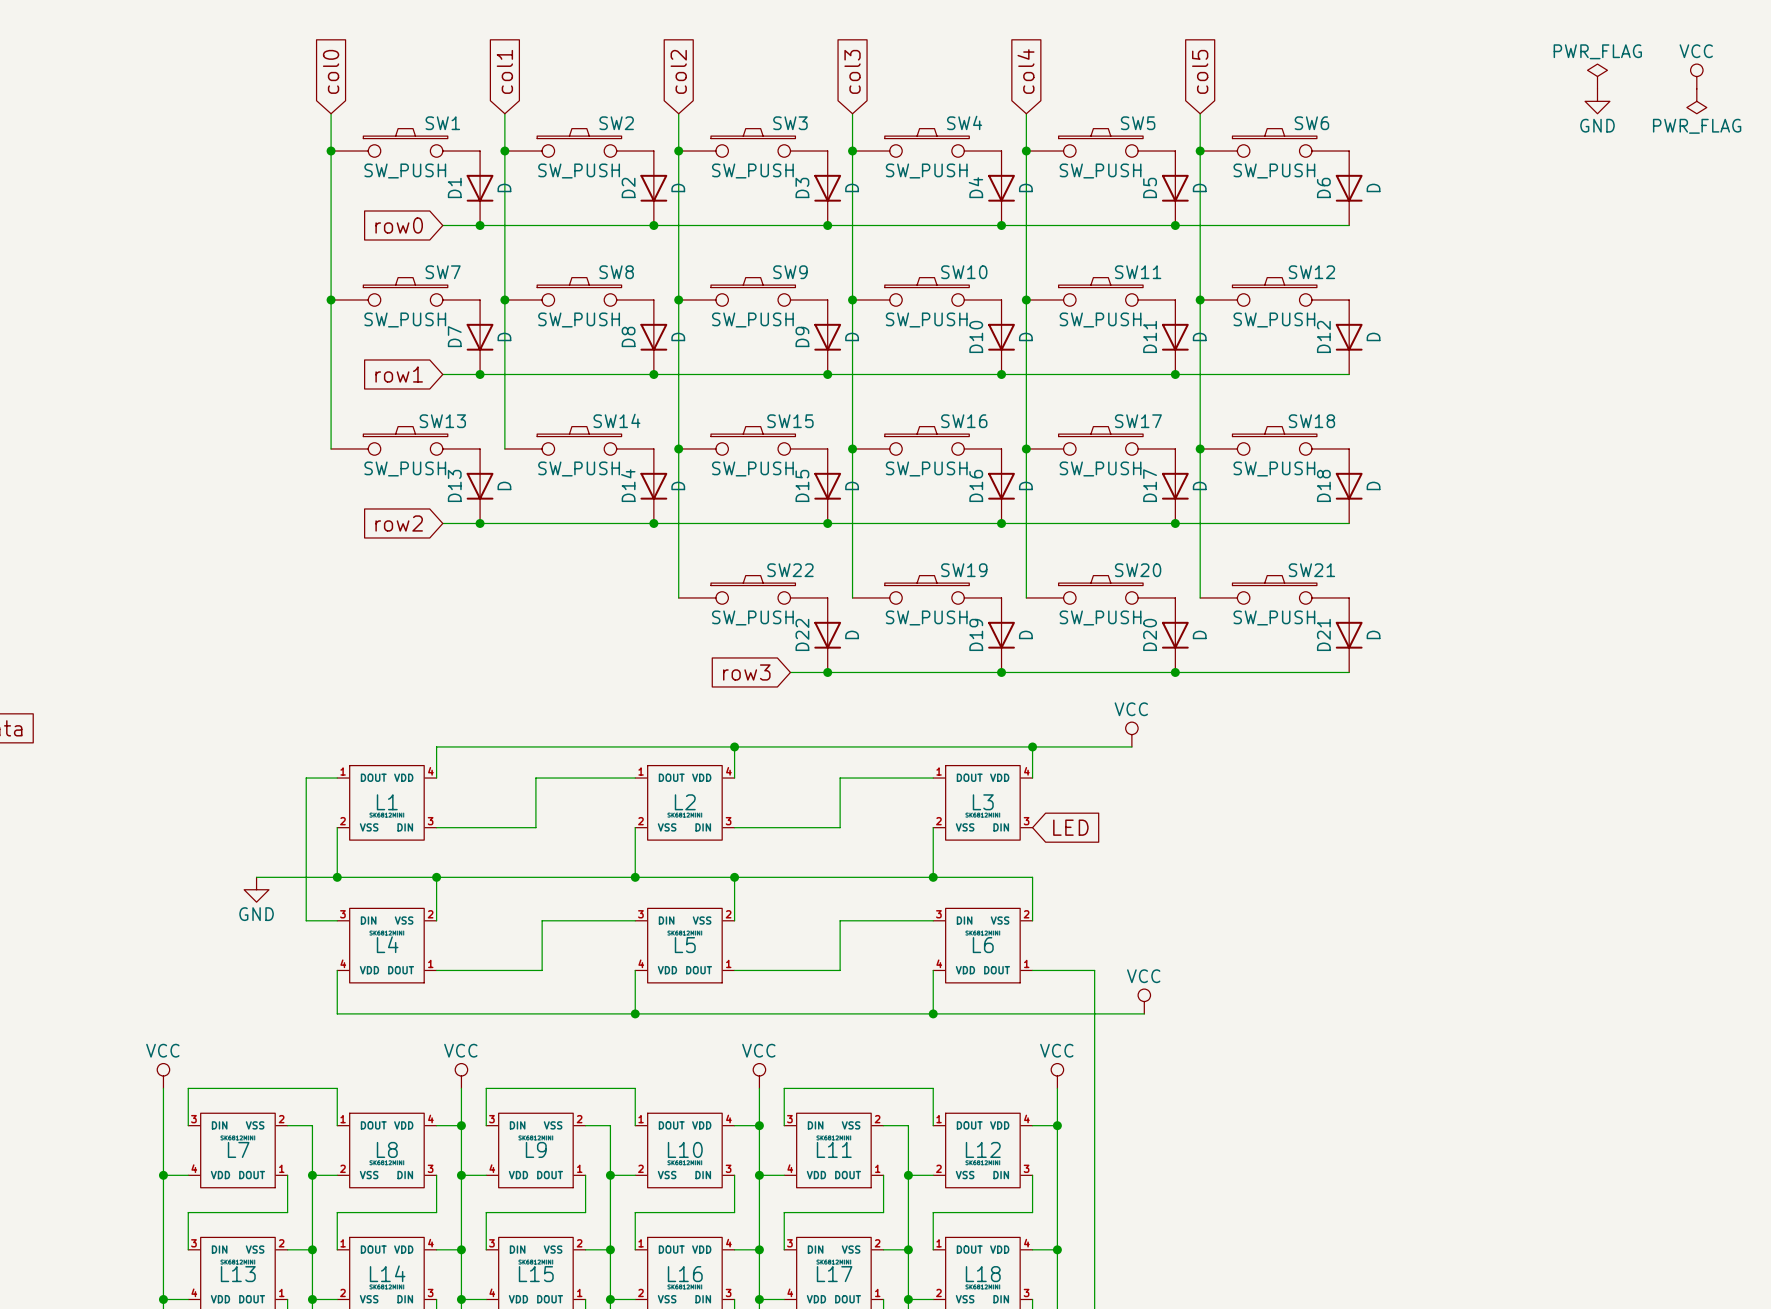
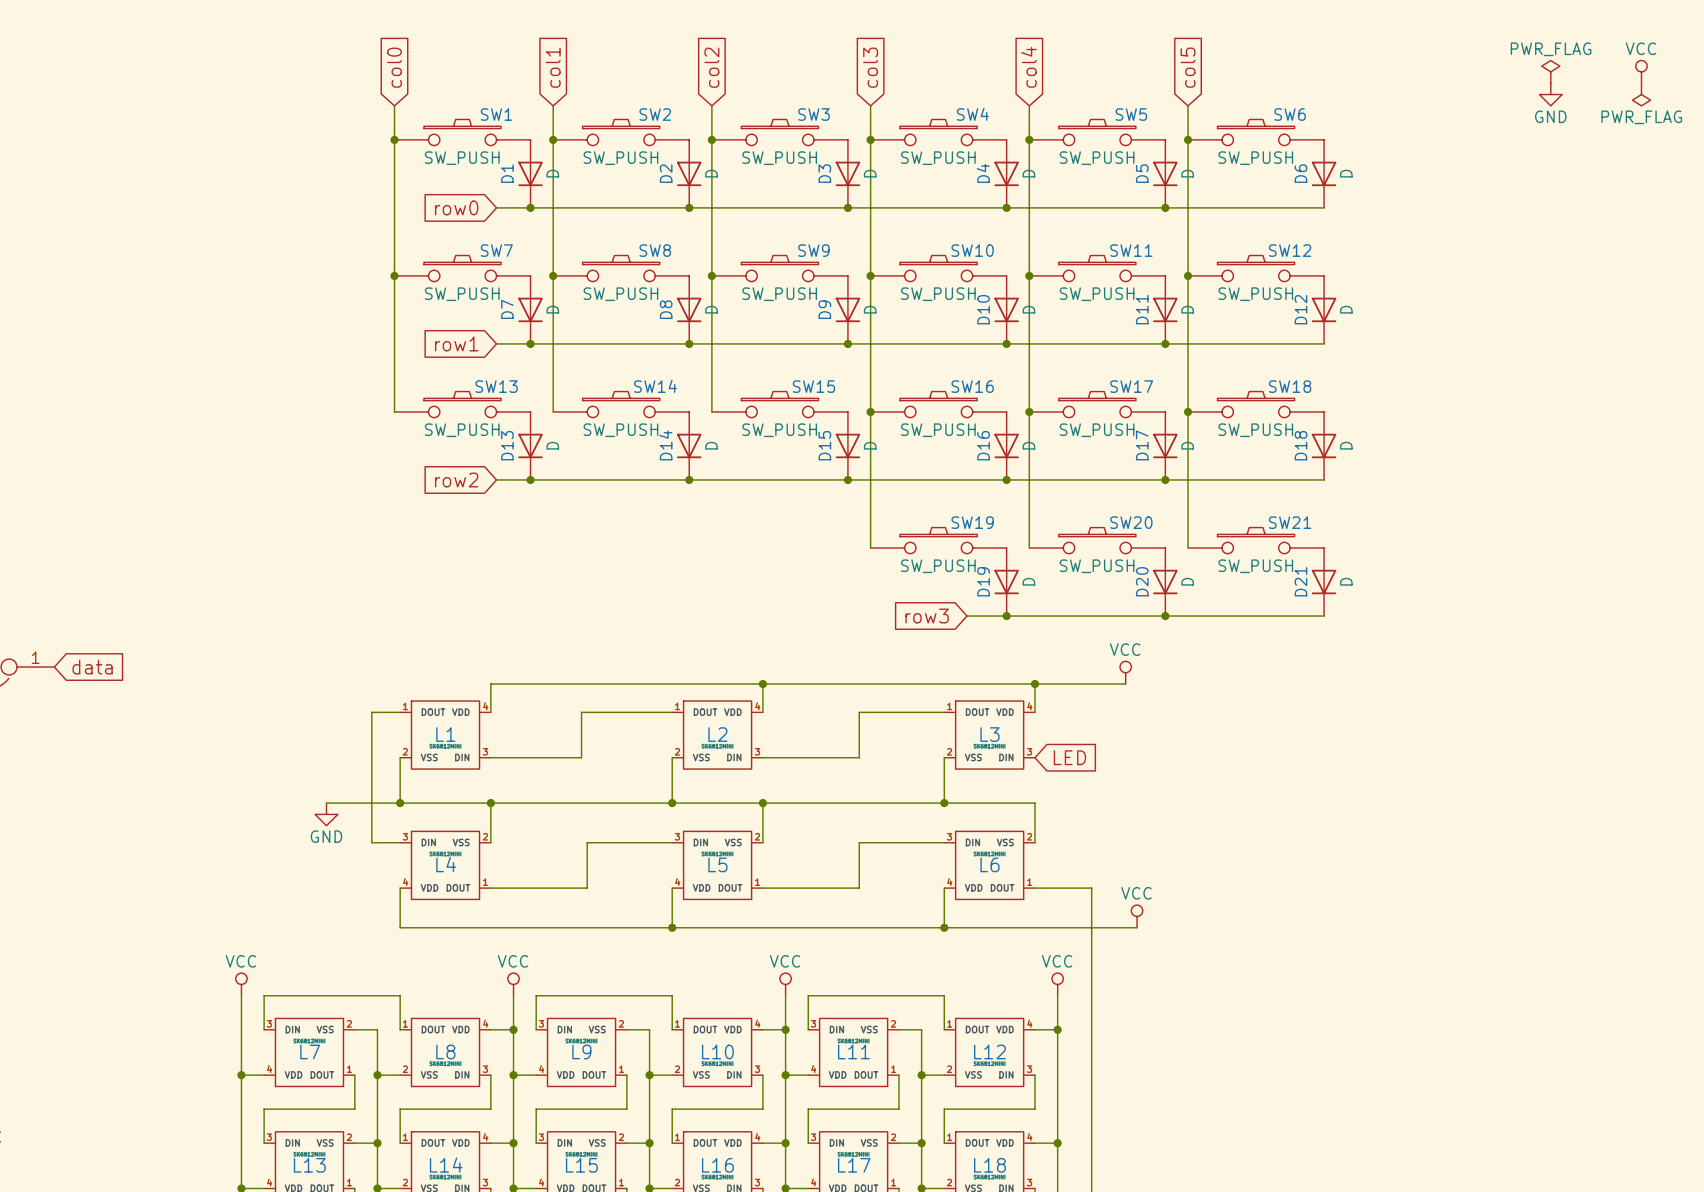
wire: (678, 448) (678, 597) -> none
junction: (678, 448) -> none
SW22: SW_PUSH (753, 589) -> none
D22: D (827, 635) -> none
global label position: row3 (746, 672) -> row3 (927, 616)
wire: (790, 672) (958, 672) -> none
junction: (827, 672) -> none

